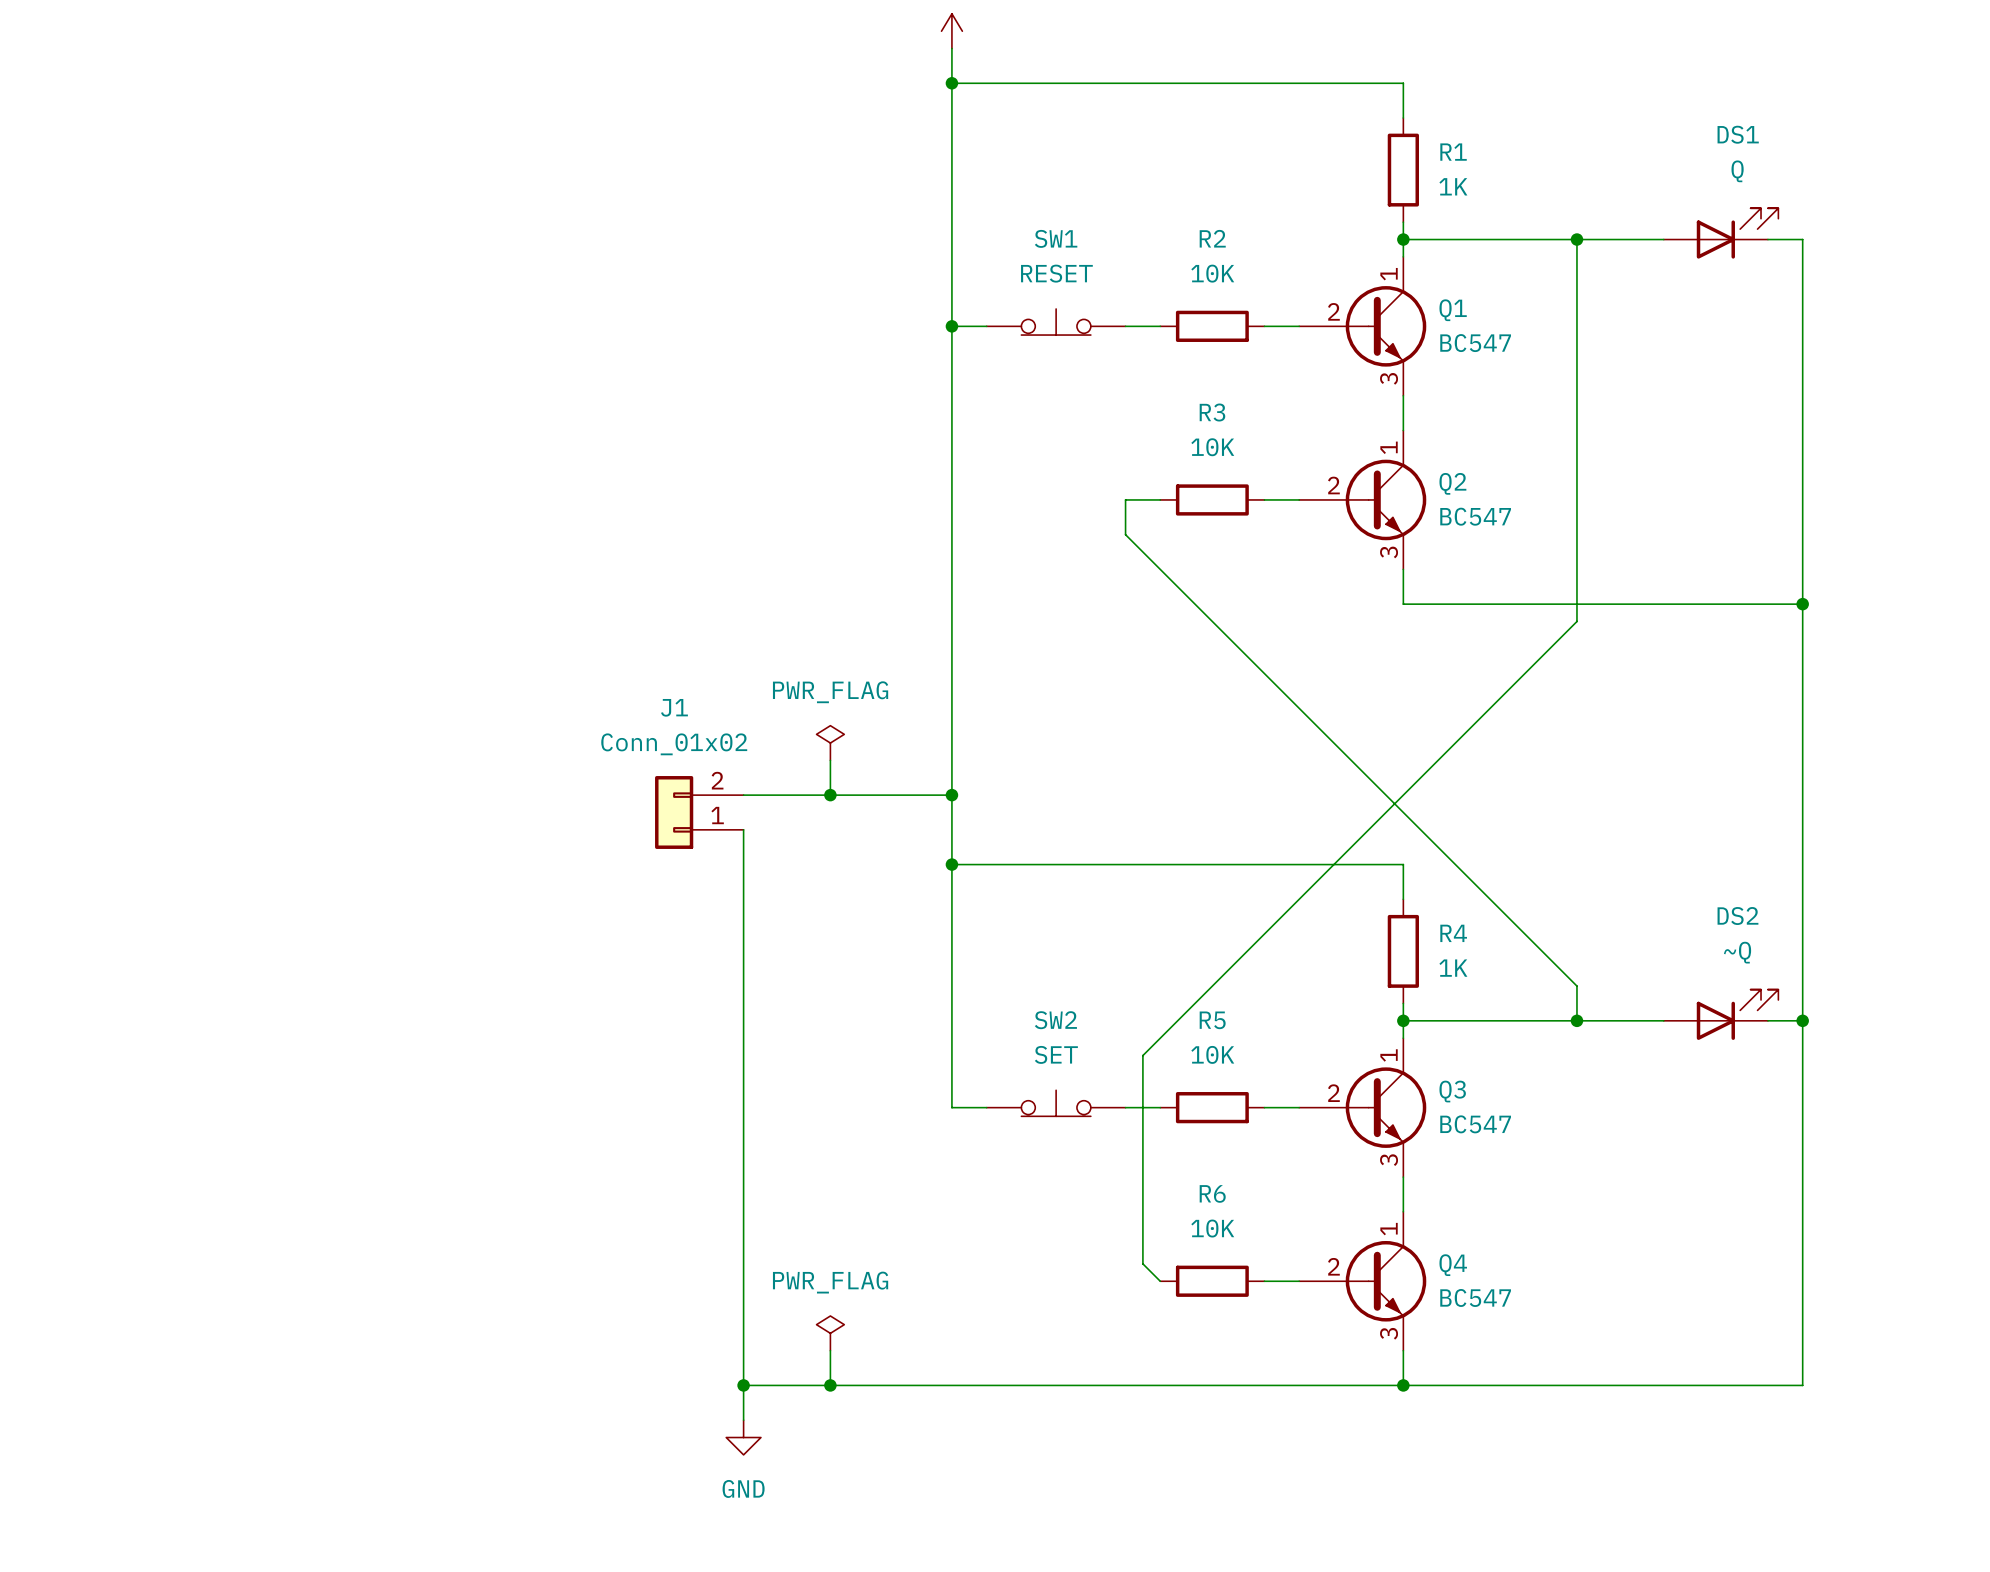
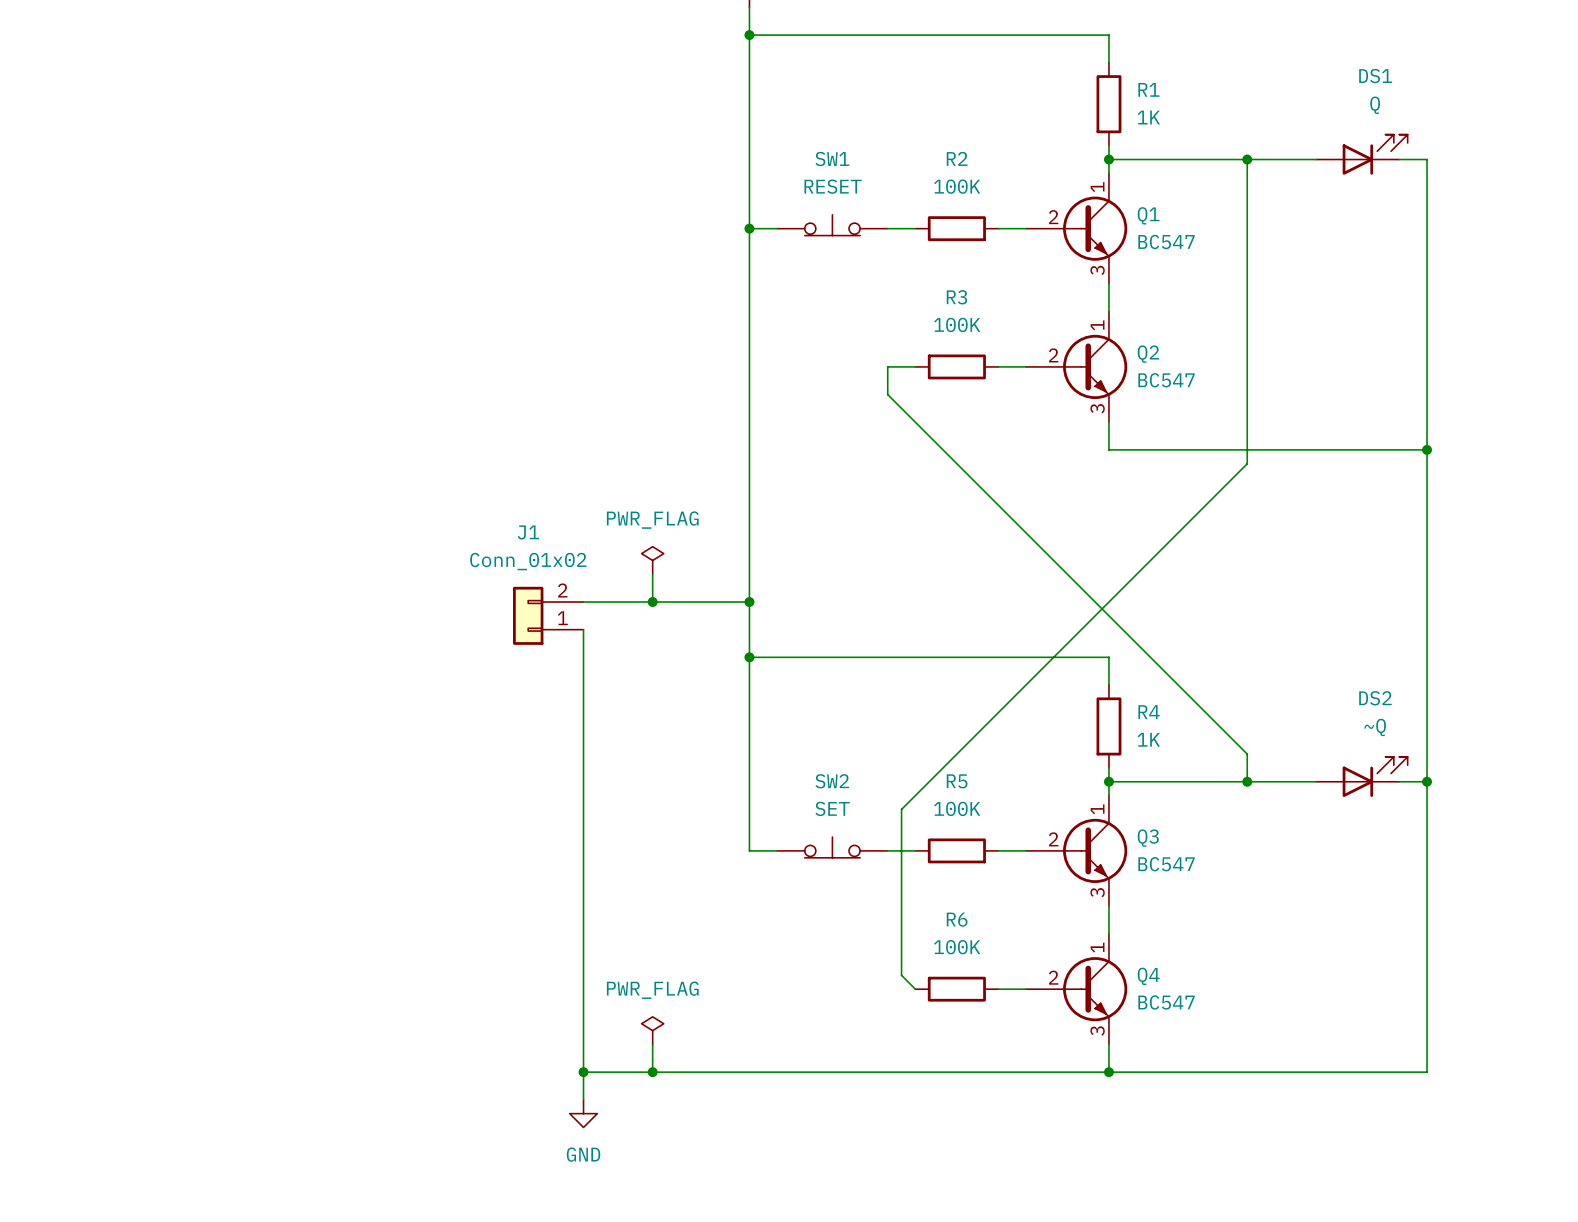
R2 value: 10K (1212, 273) -> 100K (957, 186)
R3 value: 10K (1212, 447) -> 100K (957, 324)
R5 value: 10K (1212, 1054) -> 100K (957, 808)
R6 value: 10K (1212, 1228) -> 100K (957, 947)

